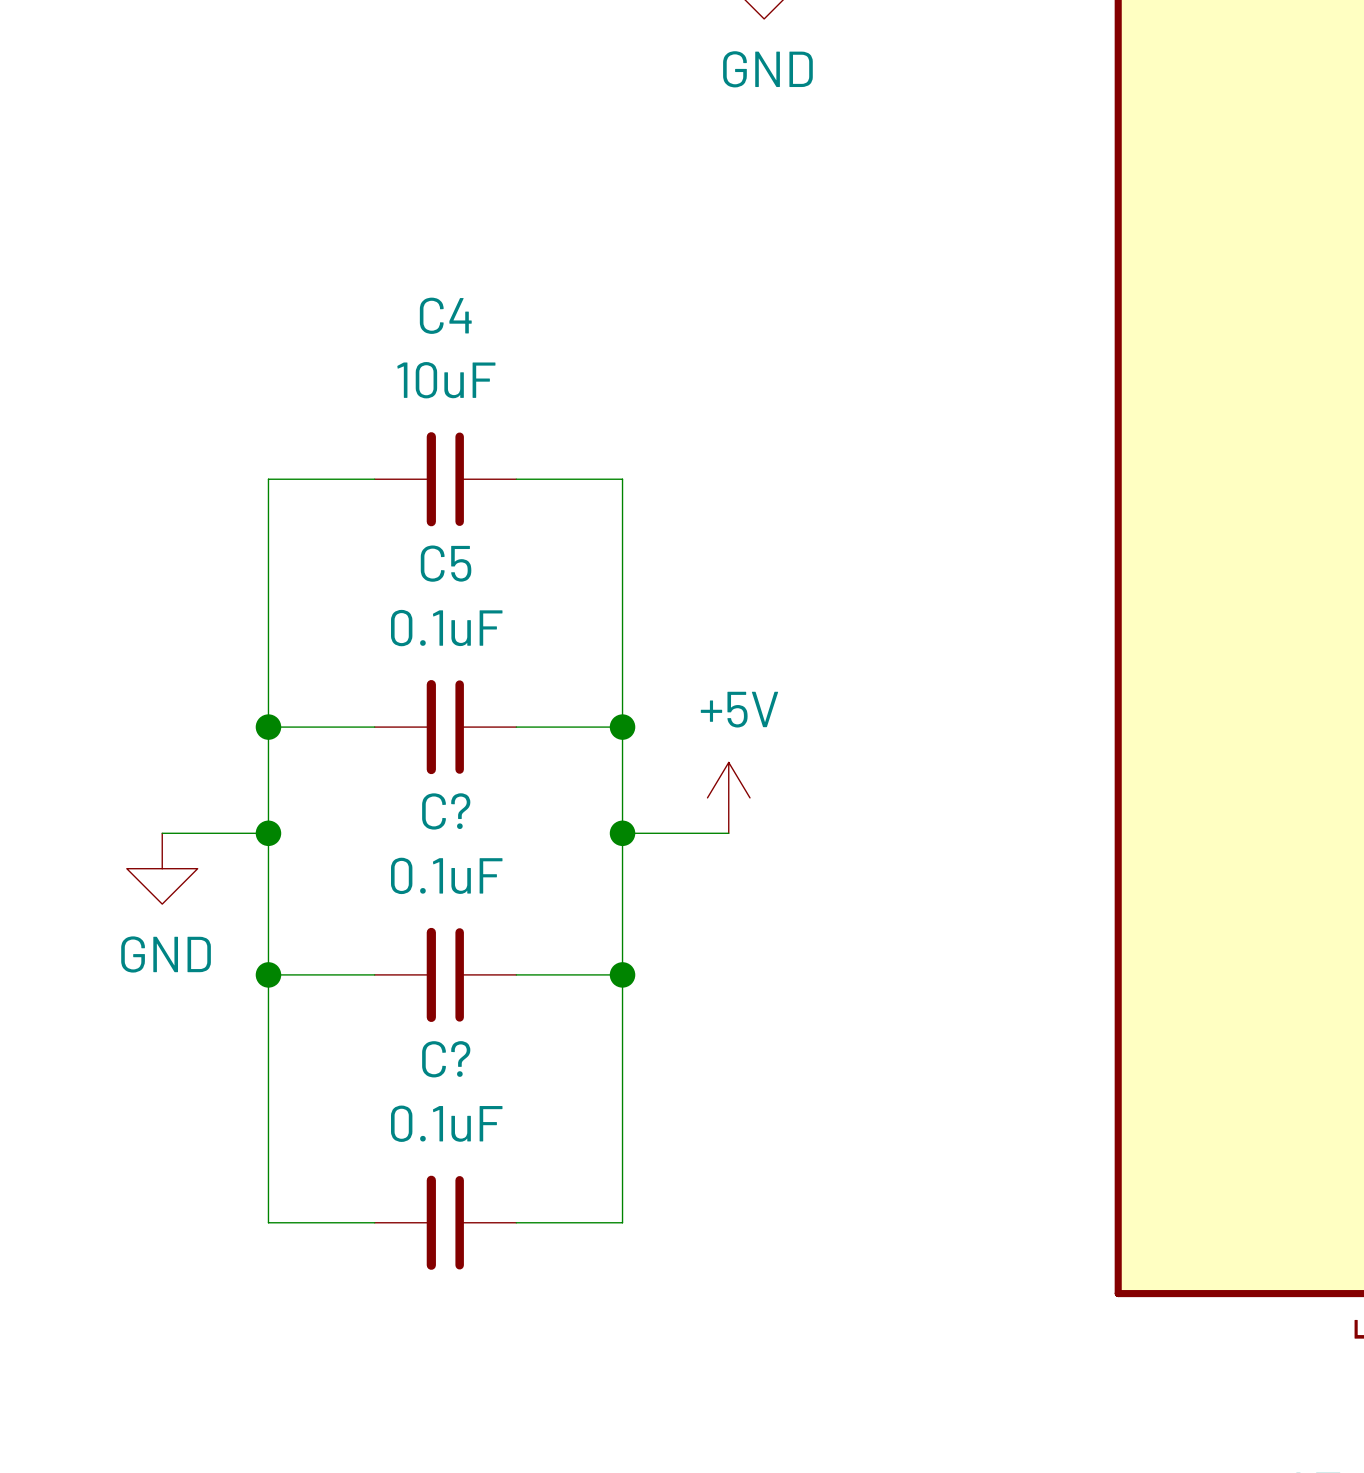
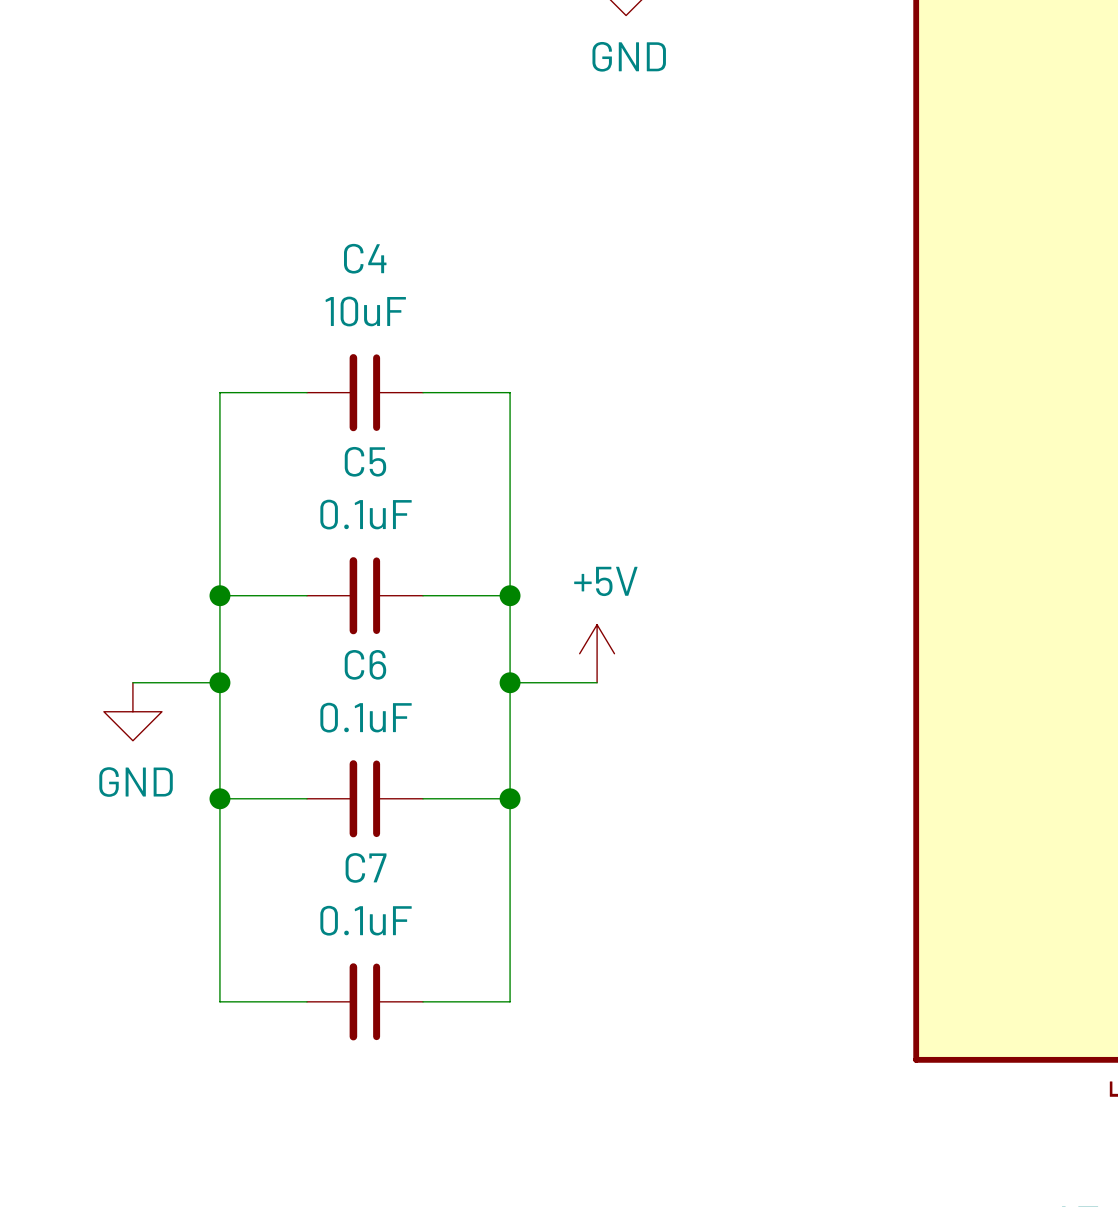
C? name: C? (446, 811) -> C6 (365, 664)
C? name: C? (446, 1059) -> C7 (366, 867)

